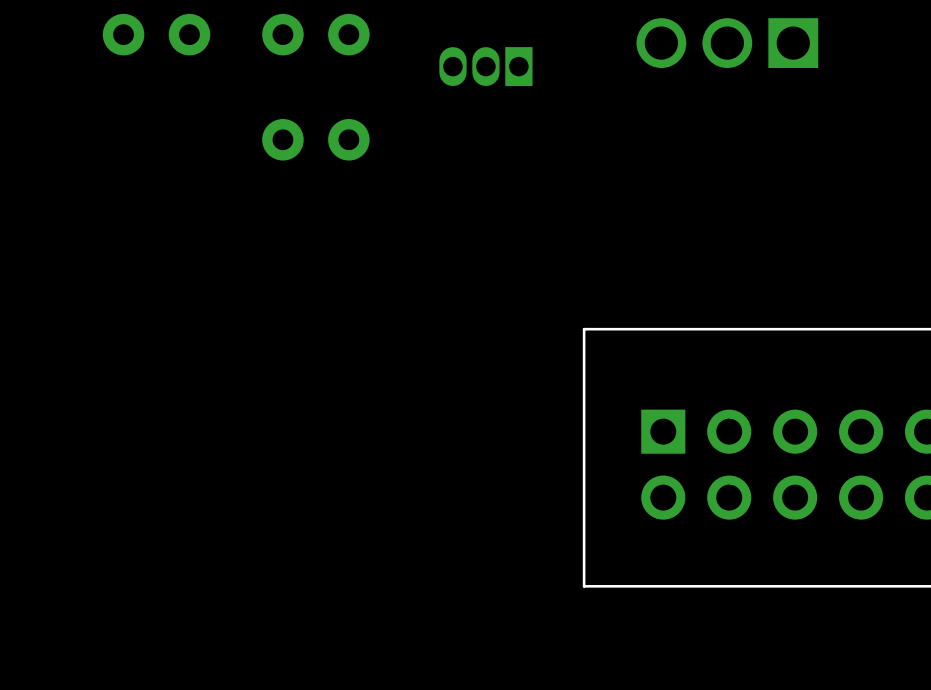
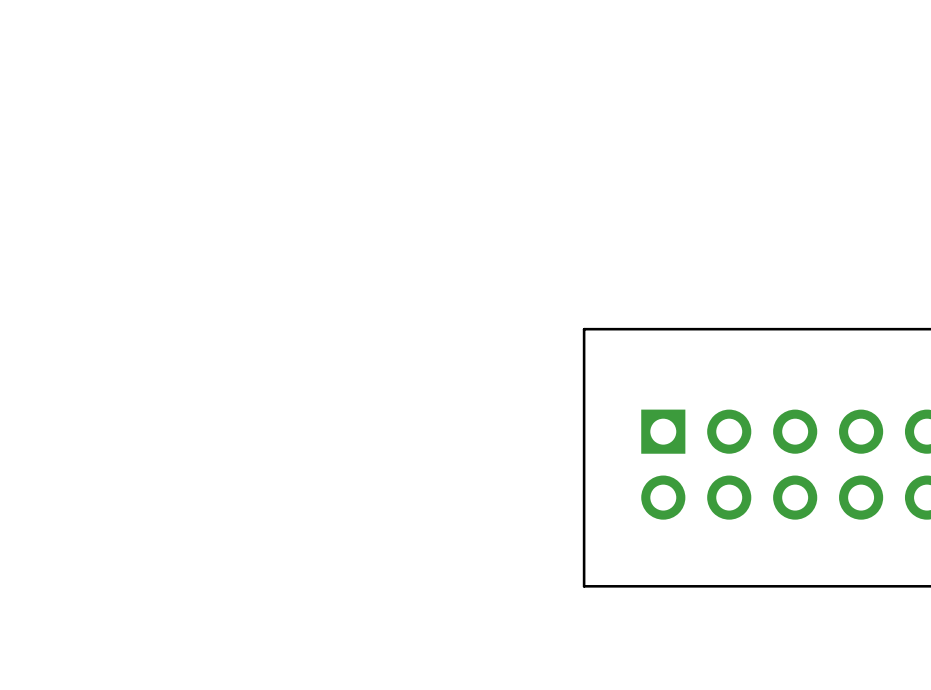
part: (156, 34) -> none
part: (315, 34) -> none
part: (727, 43) -> none
part: (485, 66) -> none
part: (315, 139) -> none

